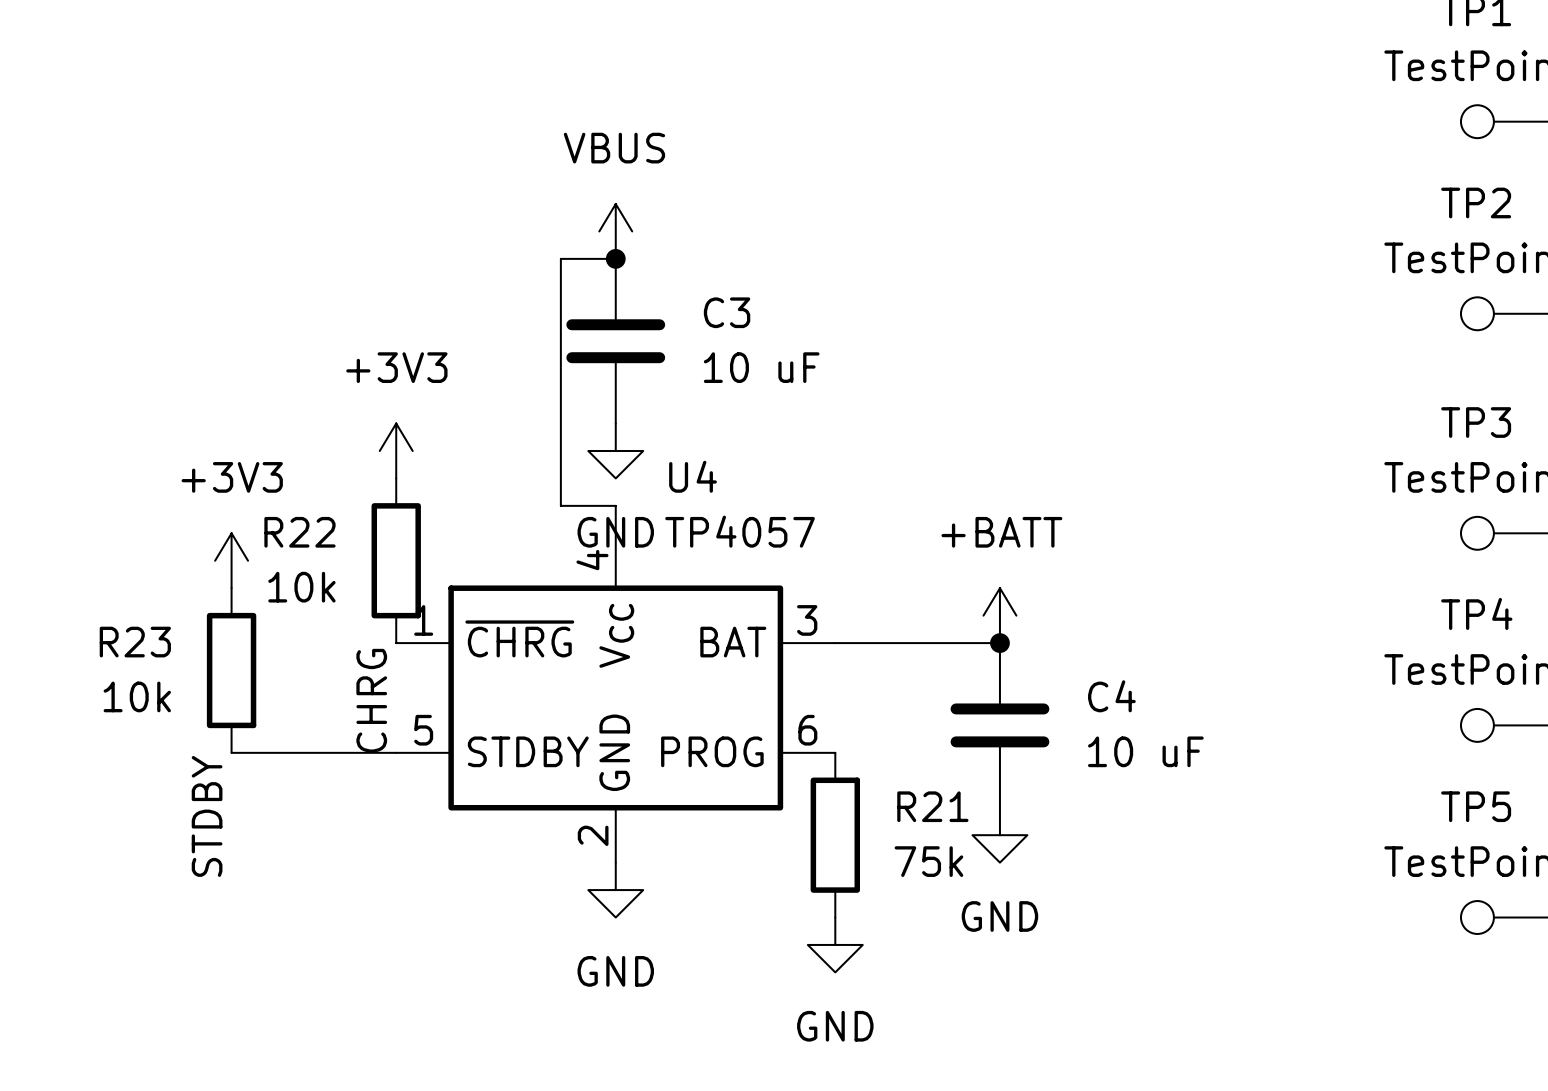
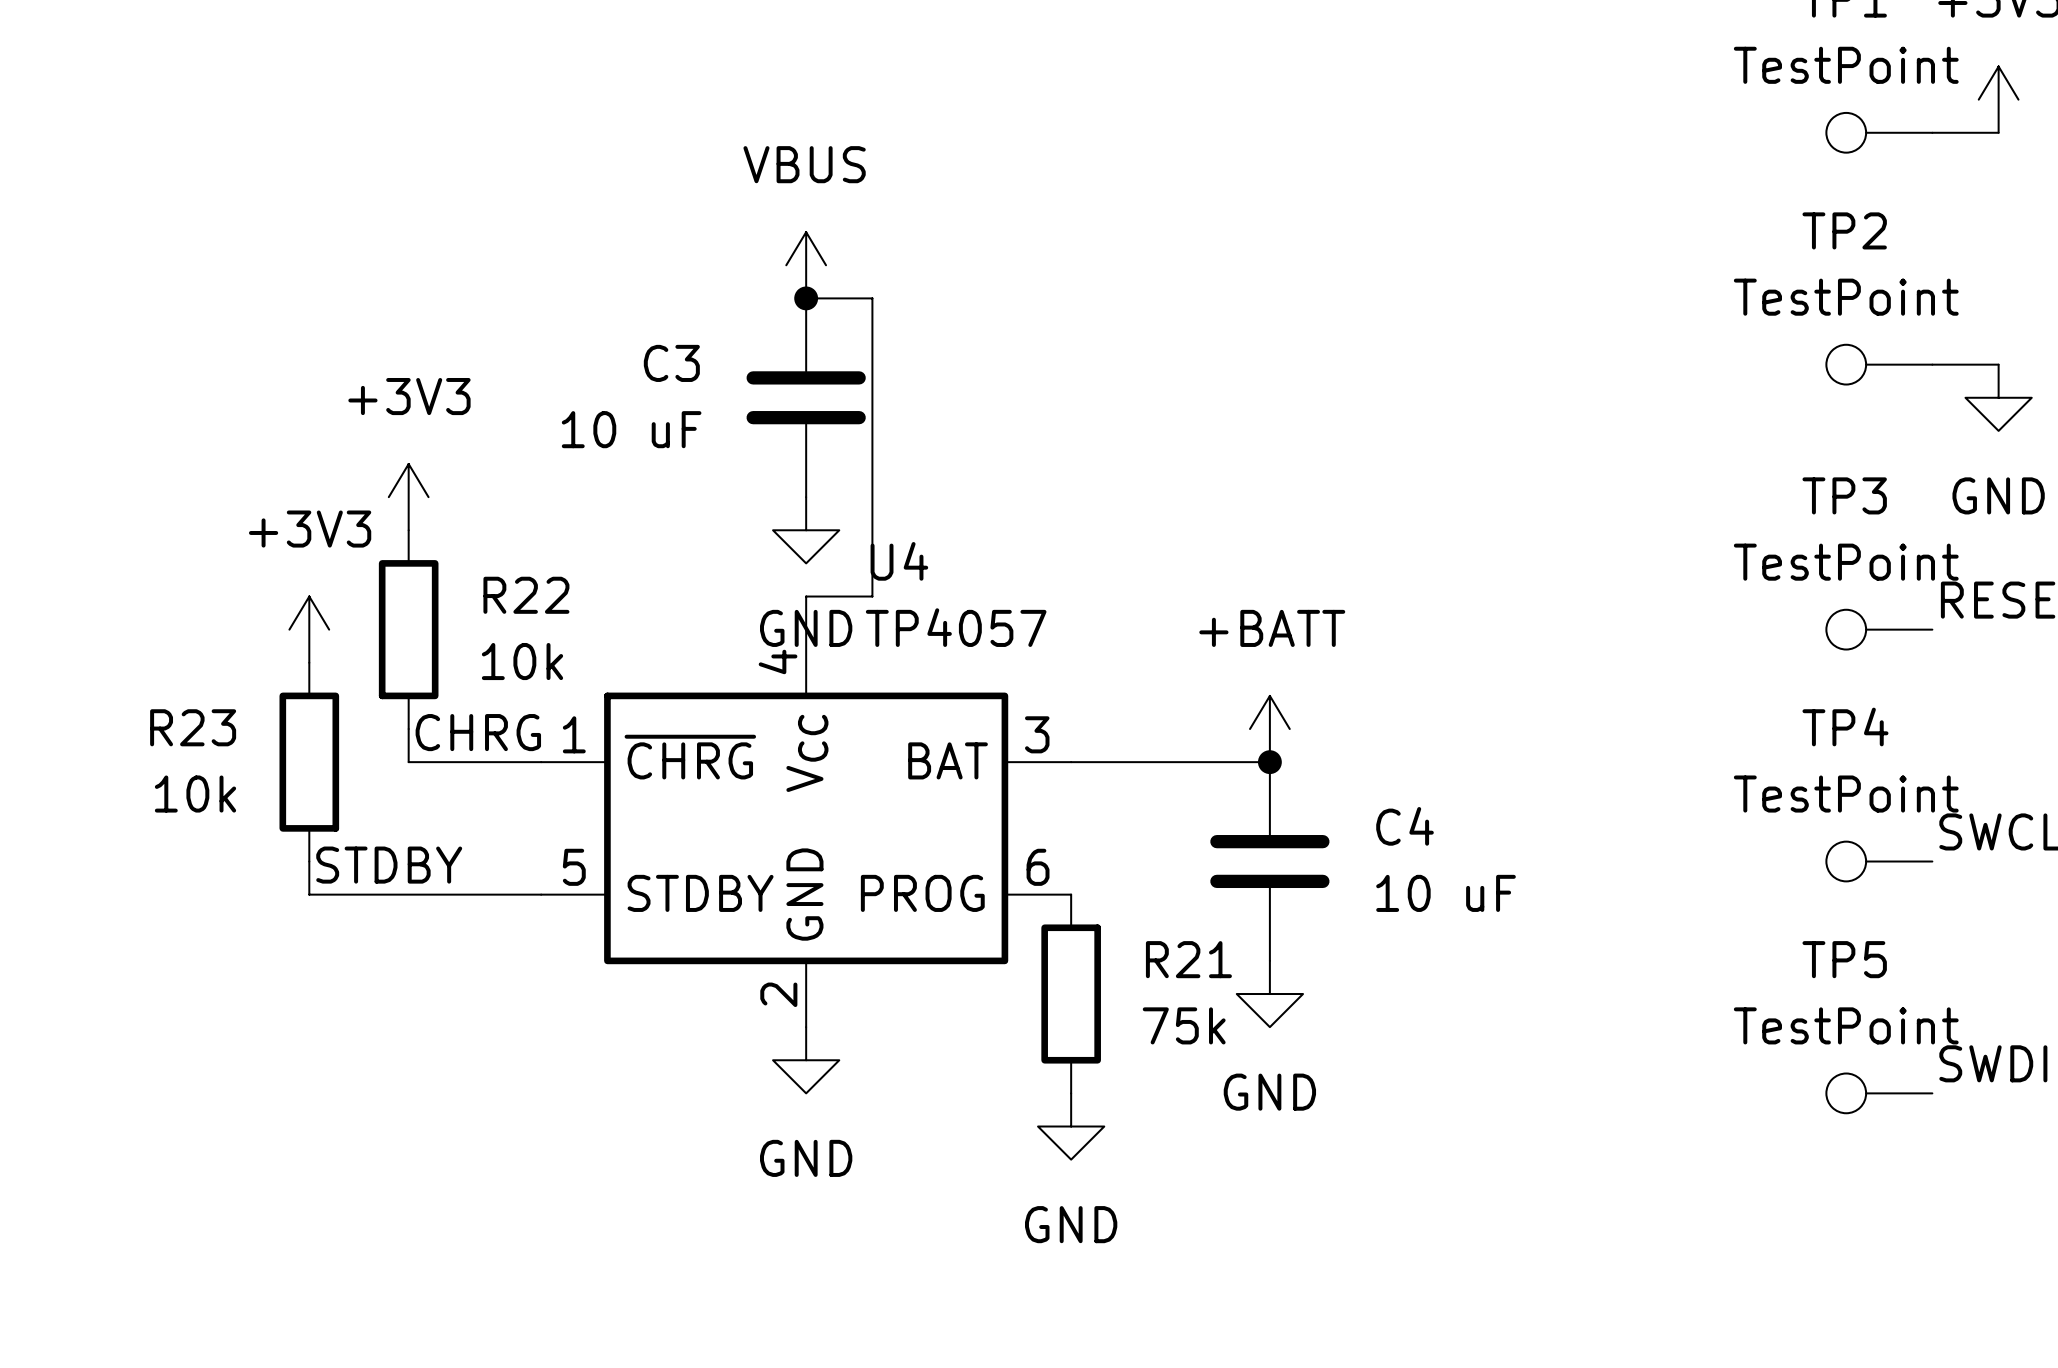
wire: (615, 258) (560, 258) (560, 505) (615, 505) -> (806, 298) (872, 298) (872, 596) (806, 596)
C3 name position: C3 (727, 312) -> C3 (671, 363)
C3 value position: 10 uF (761, 367) -> 10 uF (631, 429)
power symbol: none -> +3V3 (408, 497)
power symbol: +3V3 (396, 450) -> none
R22 name position: R22 (299, 532) -> R22 (526, 595)
power symbol position: +3V3 (231, 560) -> +3V3 (309, 629)
R22 position: (396, 560) -> (408, 629)
R22 value position: 10k (301, 587) -> 10k (522, 661)
wire: none -> (408, 729) (408, 762) (541, 762)
R23 position: (231, 670) -> (309, 762)
label rotation: 0° (371, 700) -> 90° clockwise (478, 732)
wire: none -> (309, 861) (309, 894) (342, 894)
label rotation: 0° (207, 816) -> 90° clockwise (389, 865)

